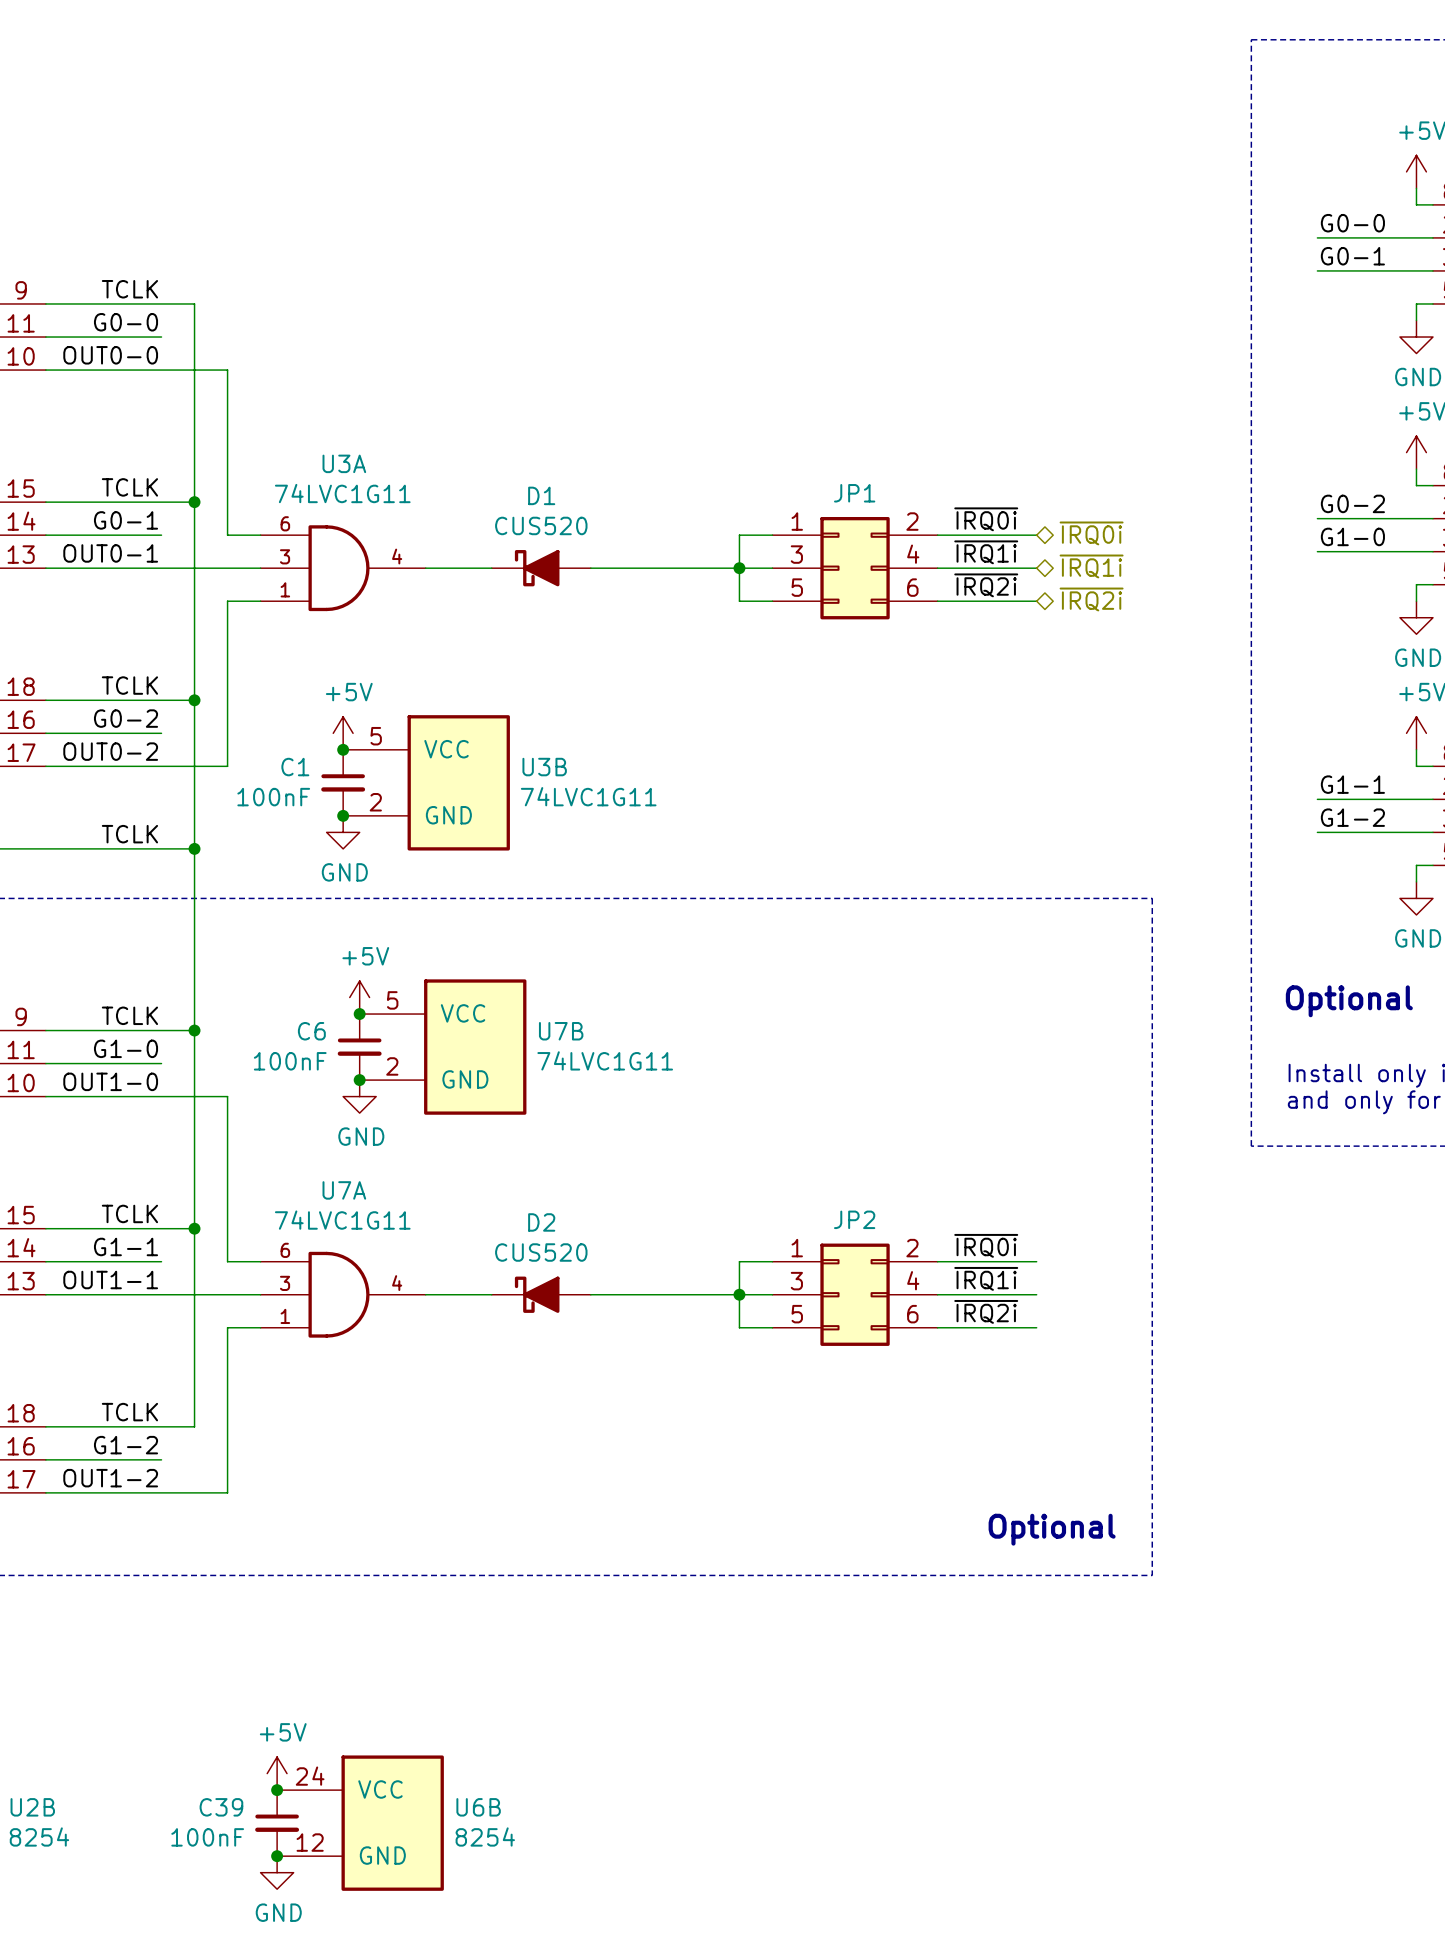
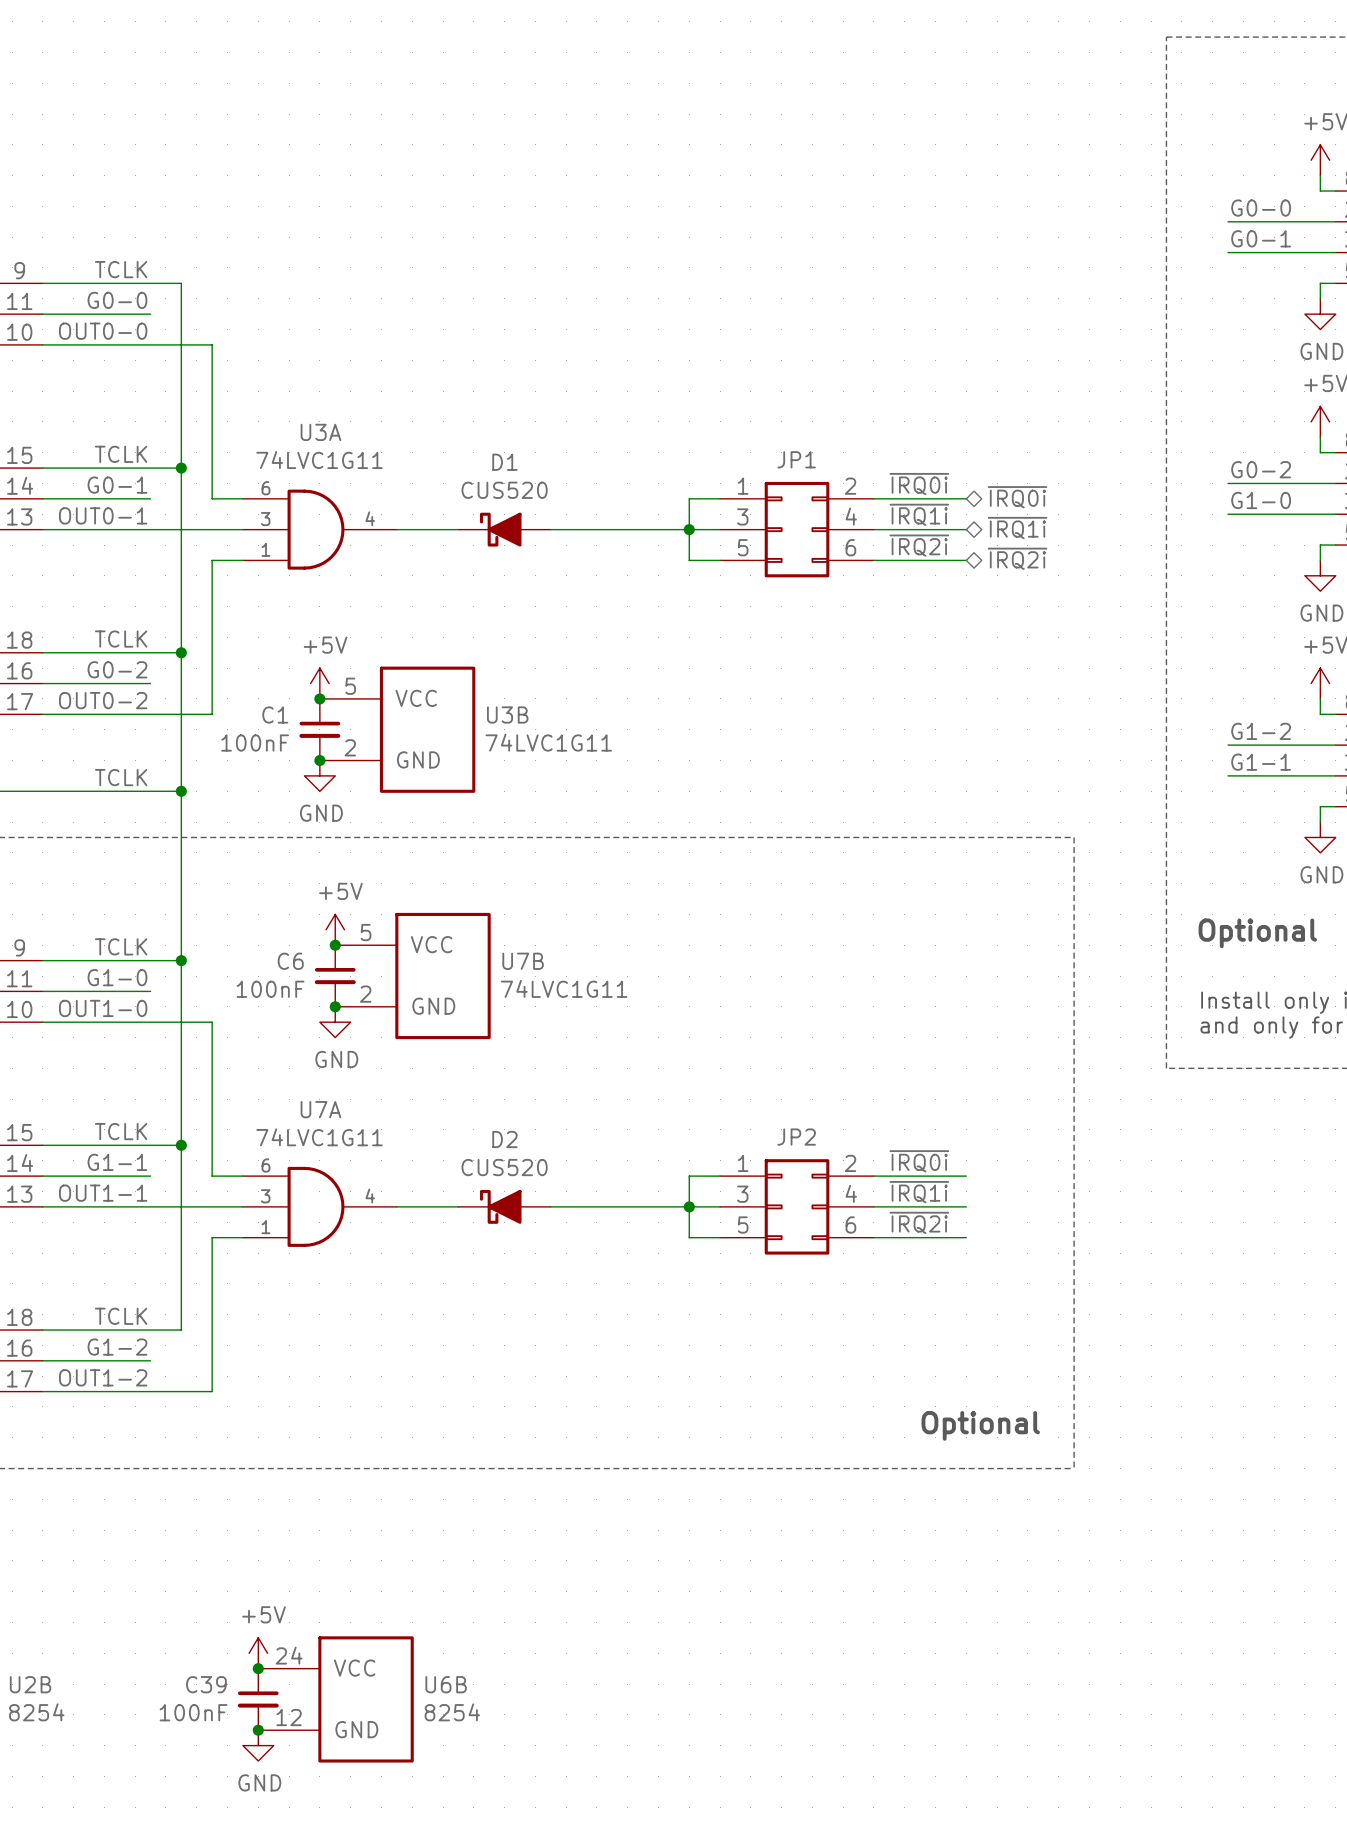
label: G1-1 (1352, 784) -> G1-2 (1261, 731)
label: G1-2 (1352, 817) -> G1-1 (1261, 762)

